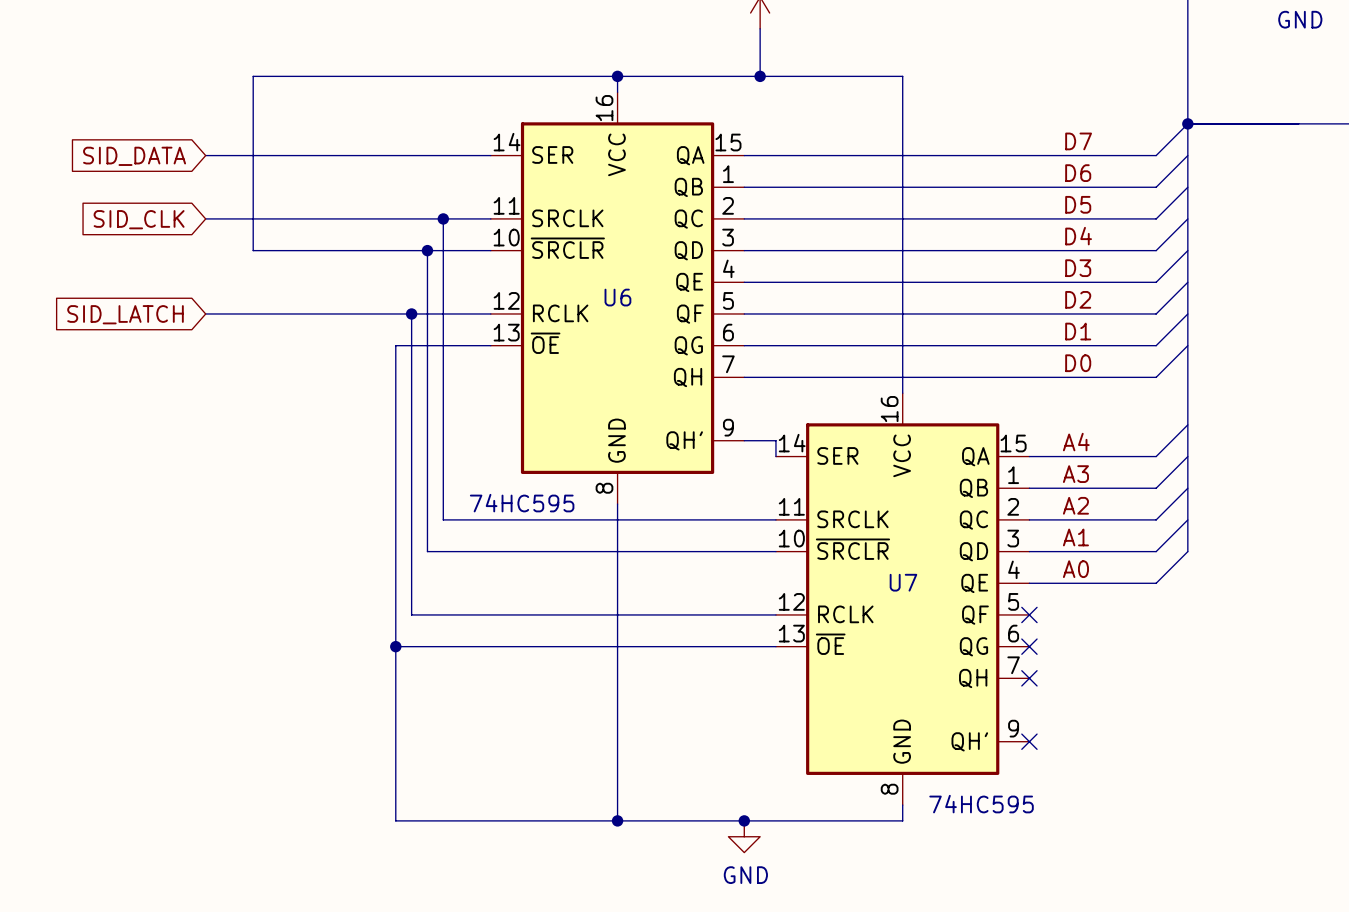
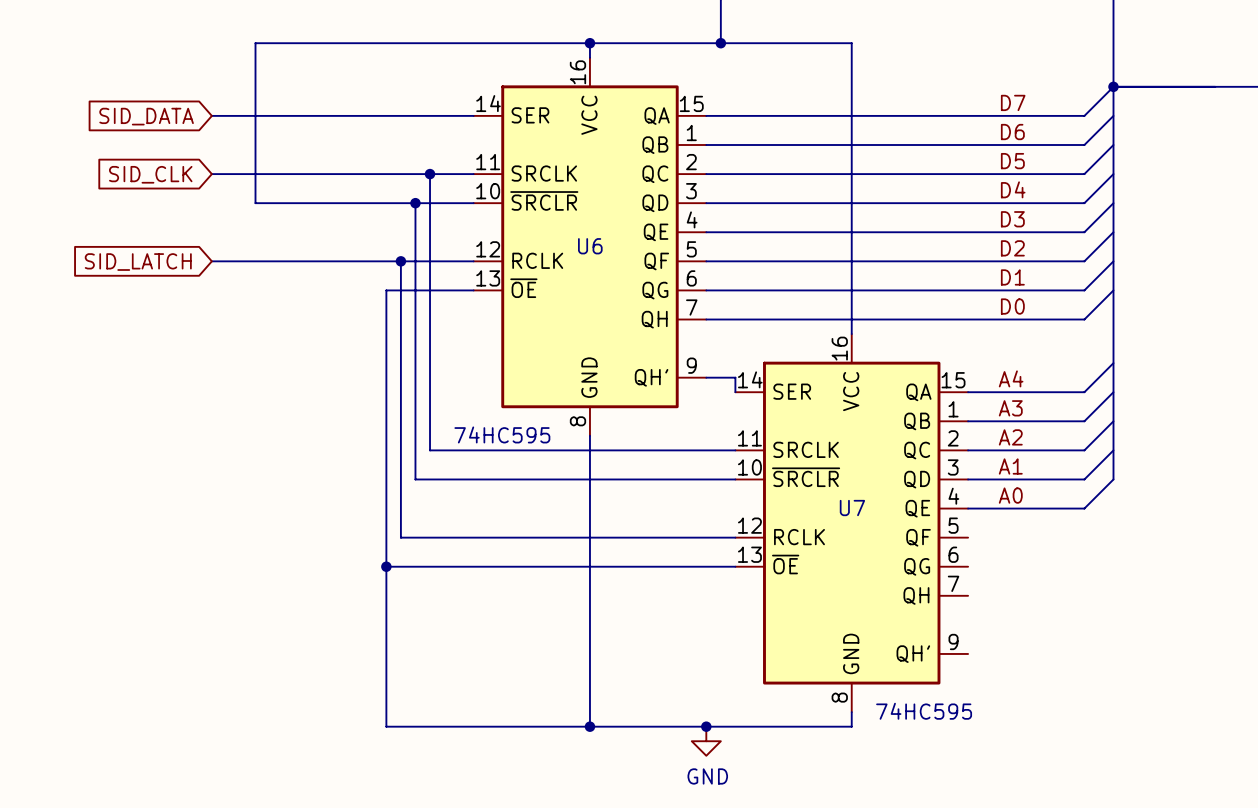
no-connect mark: (1029, 614) -> none
no-connect mark: (1029, 646) -> none
no-connect mark: (1029, 678) -> none
no-connect mark: (1029, 741) -> none

